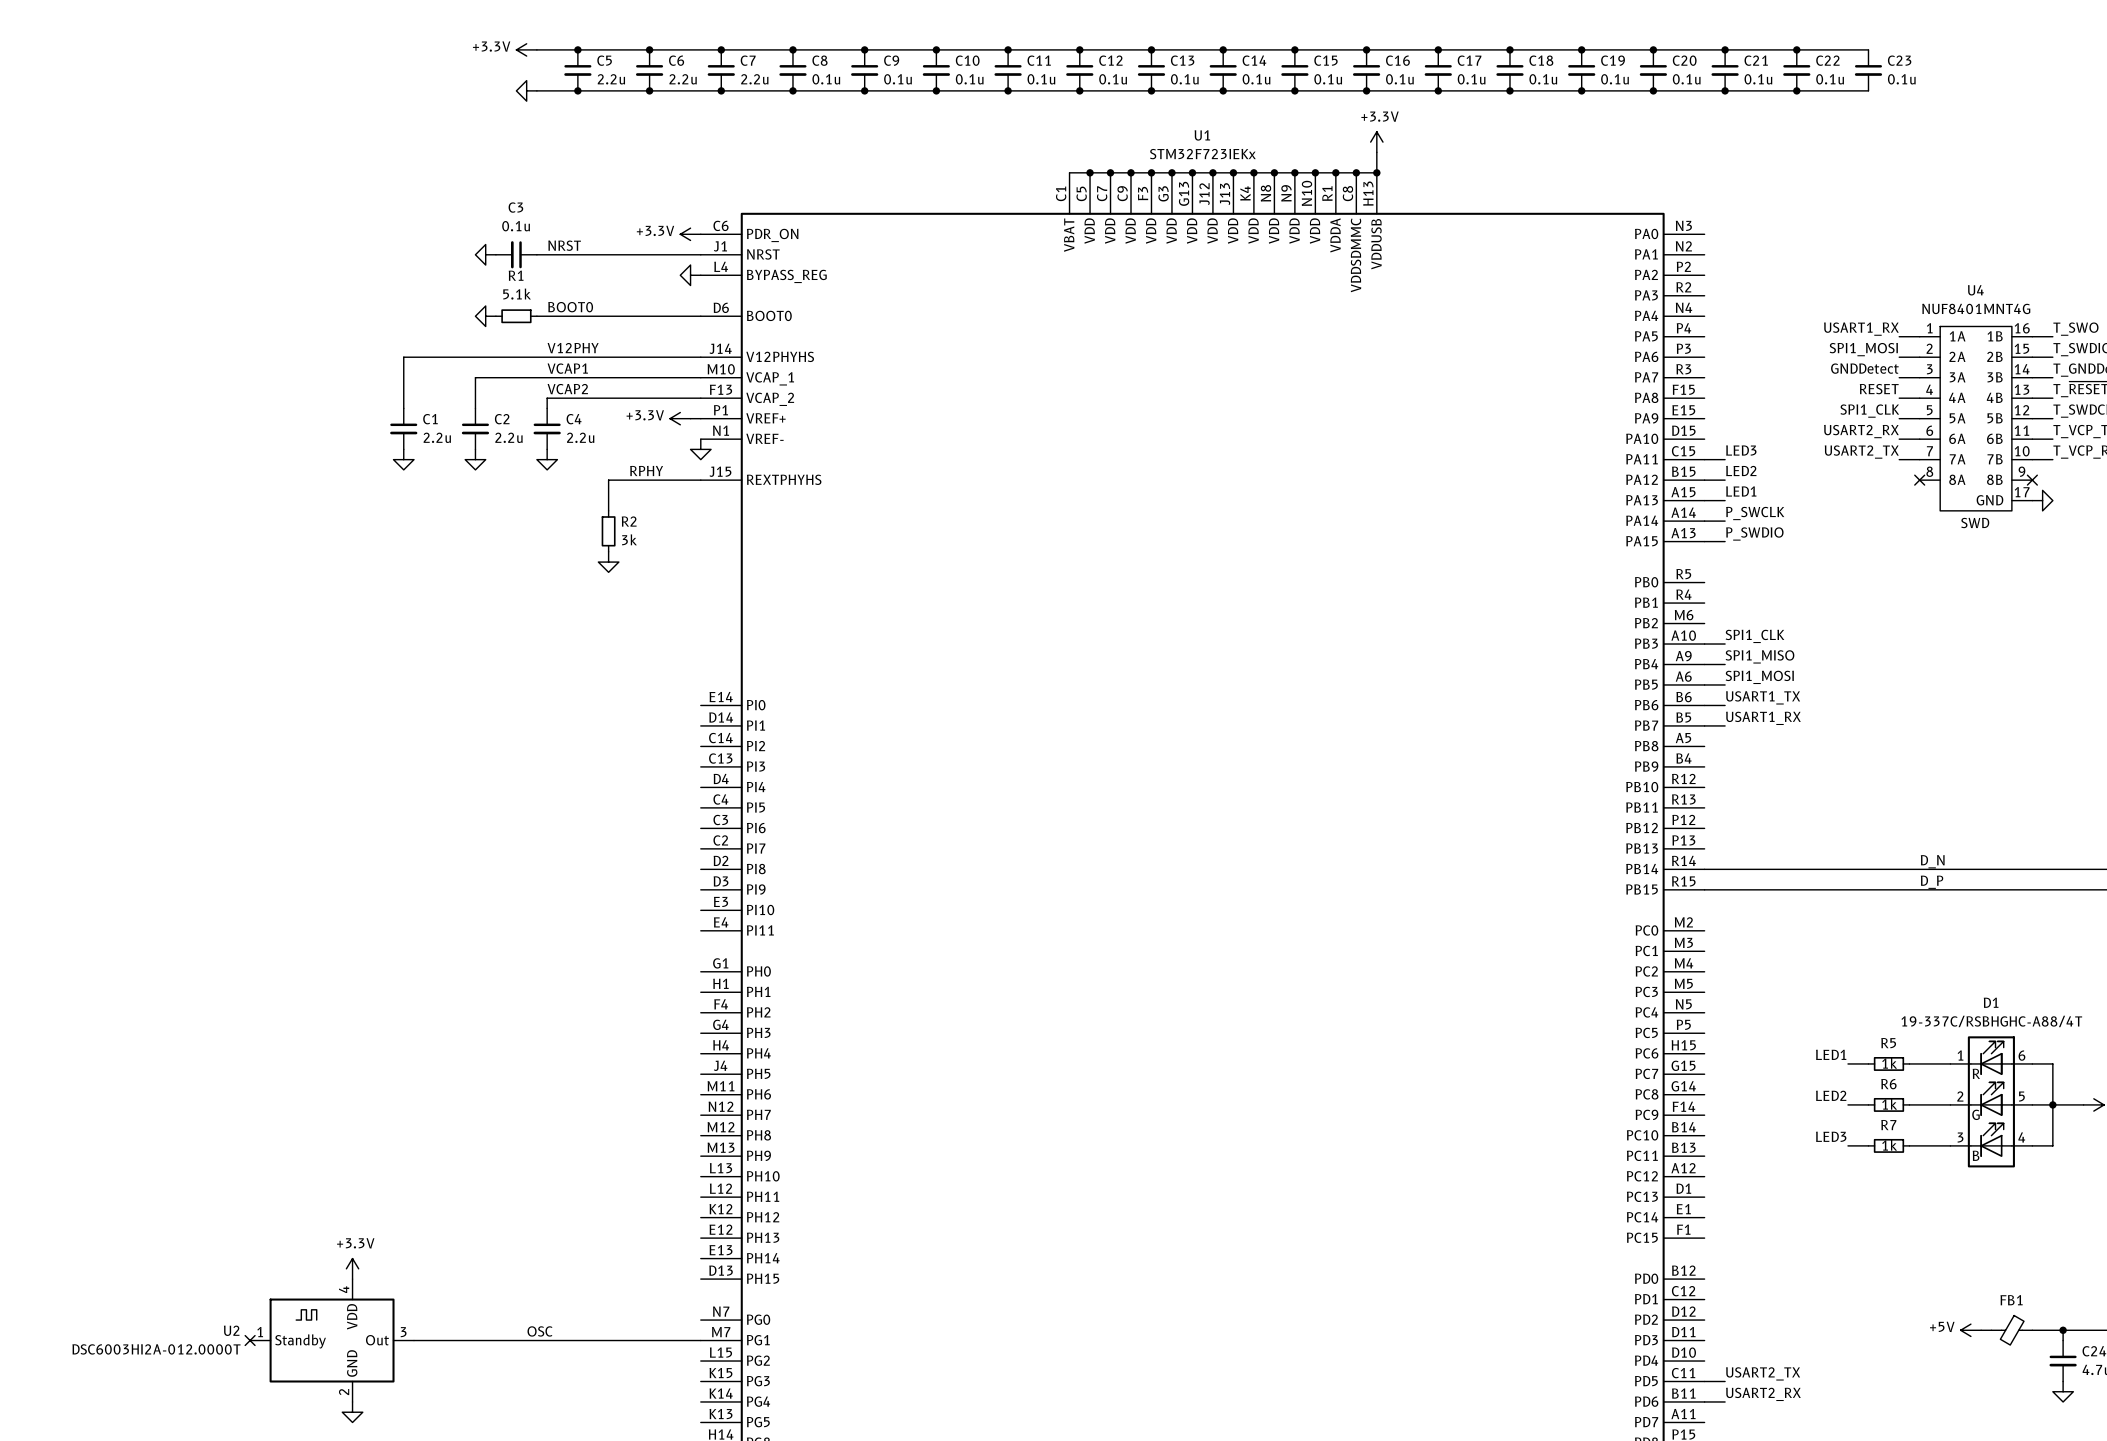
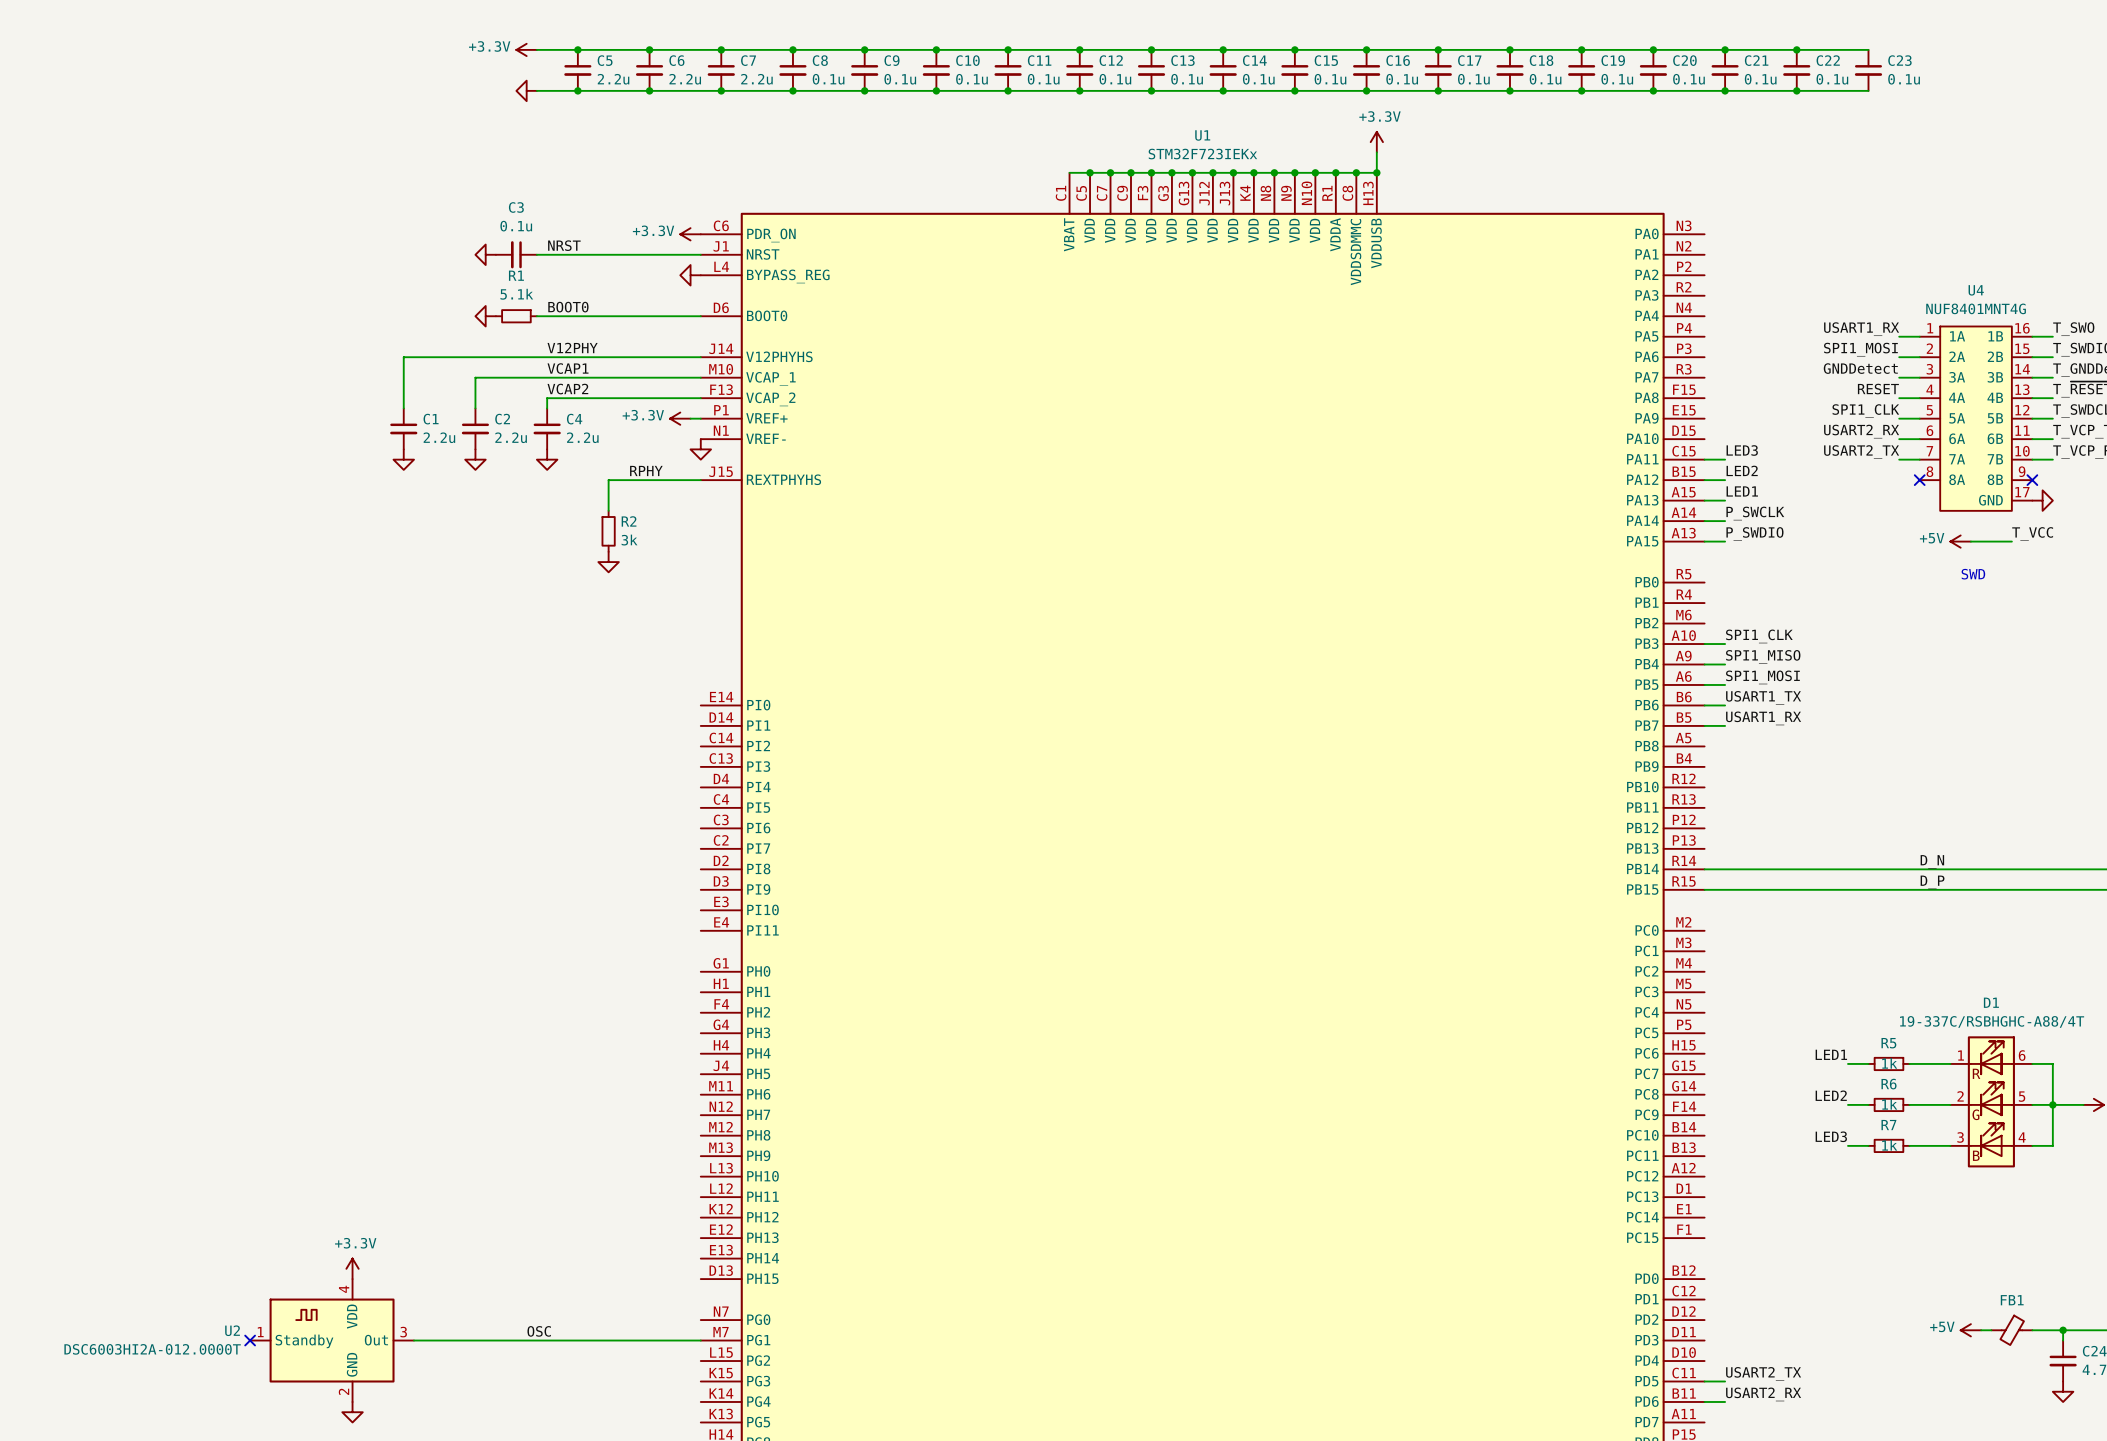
text position: SWD (1975, 523) -> SWD (1973, 574)
label: none -> T_VCC (2032, 534)
power symbol: none -> +5V (1960, 541)
wire: none -> (1970, 541) (2011, 541)

